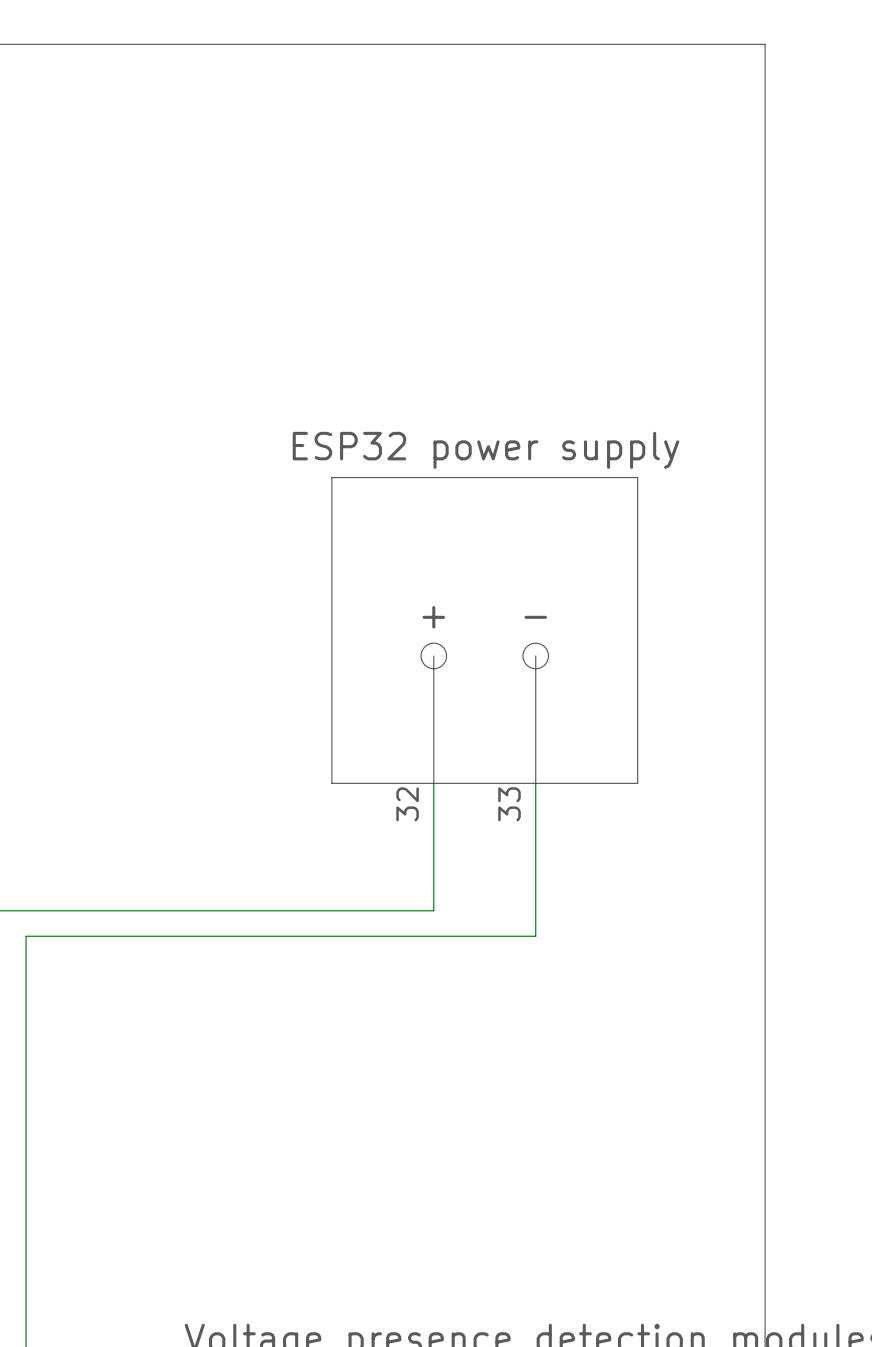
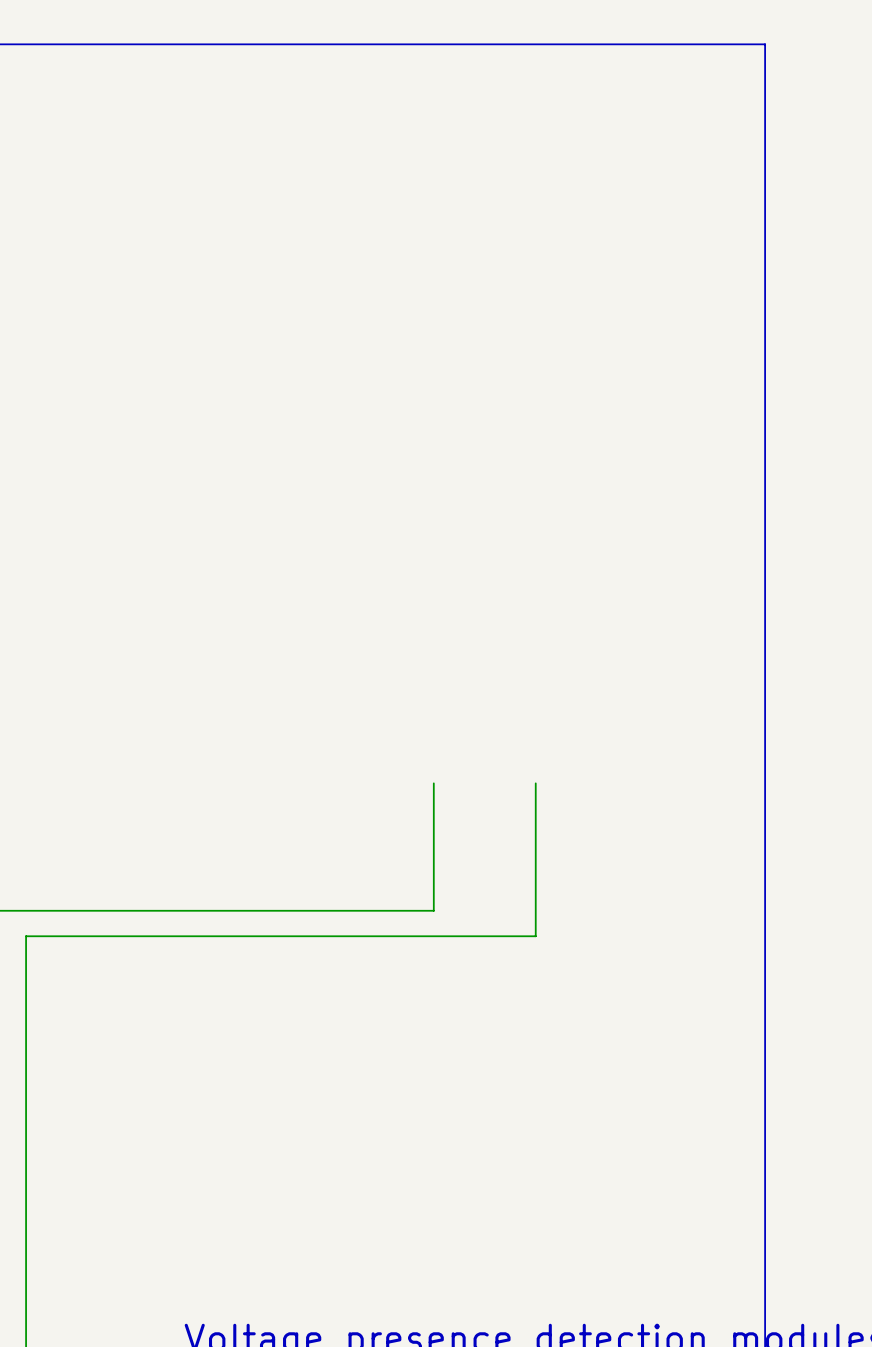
text: ESP32 power supply (485, 450) -> none
line: (331, 477) (637, 477) (637, 783) (331, 783) (331, 477) -> none
text: + (433, 617) -> none
text: - (535, 617) -> none
drawing: [421, 643, 447, 669] -> none
drawing: [522, 643, 549, 669] -> none
line: (433, 655) (433, 783) -> none
line: (535, 655) (535, 783) -> none
text: 32 (407, 804) -> none
text: 33 (509, 804) -> none

